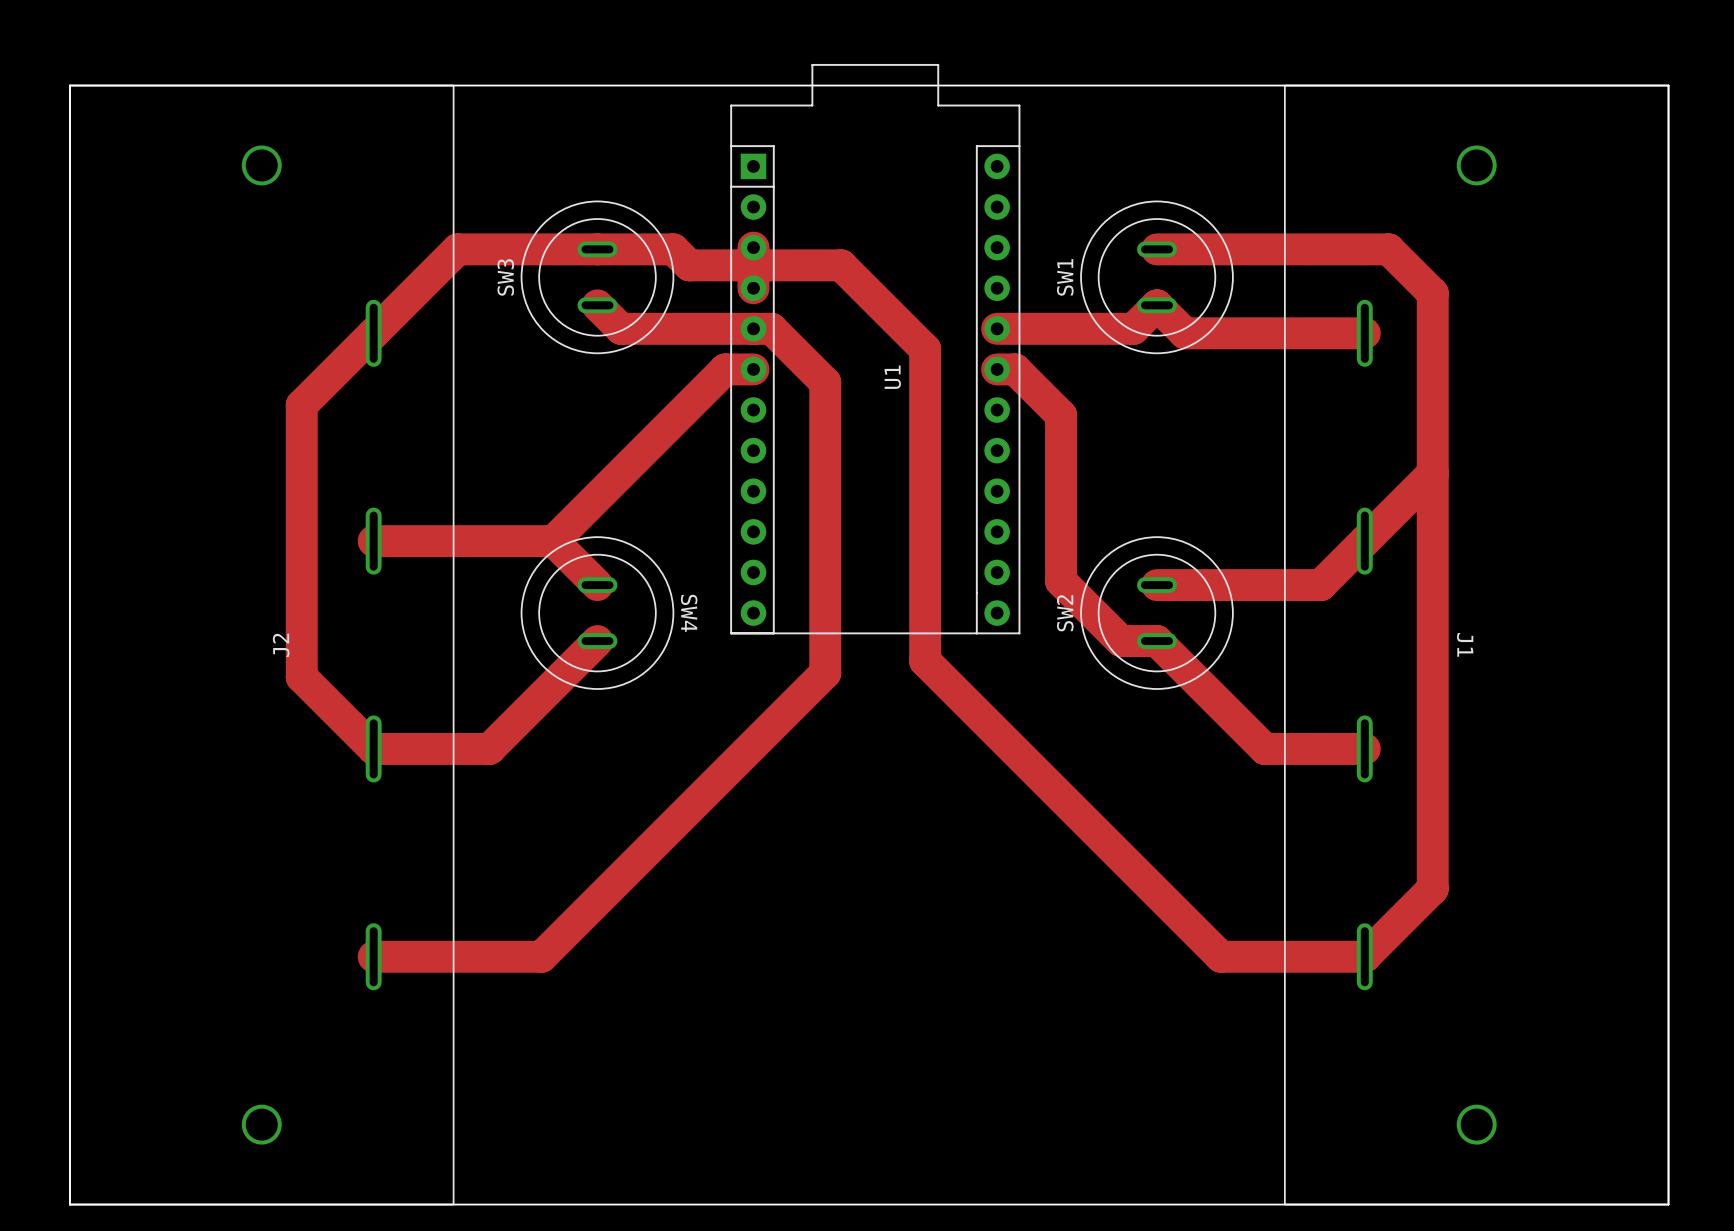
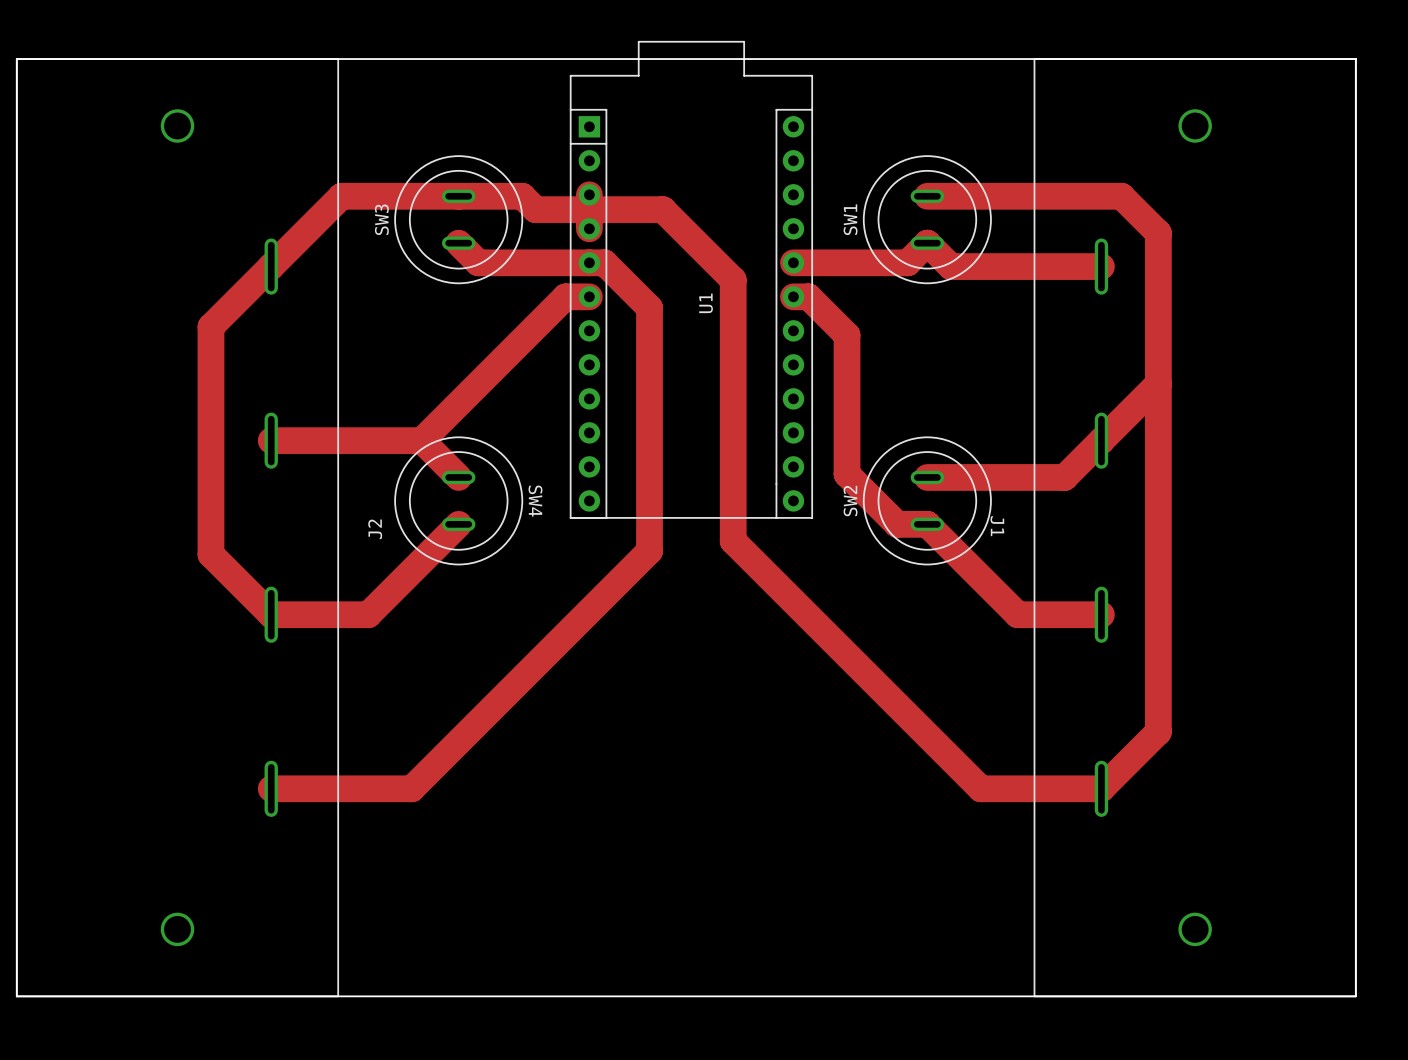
J1 name position: J1 (1465, 644) -> J1 (997, 526)
J2 name position: J2 (281, 645) -> J2 (375, 529)

